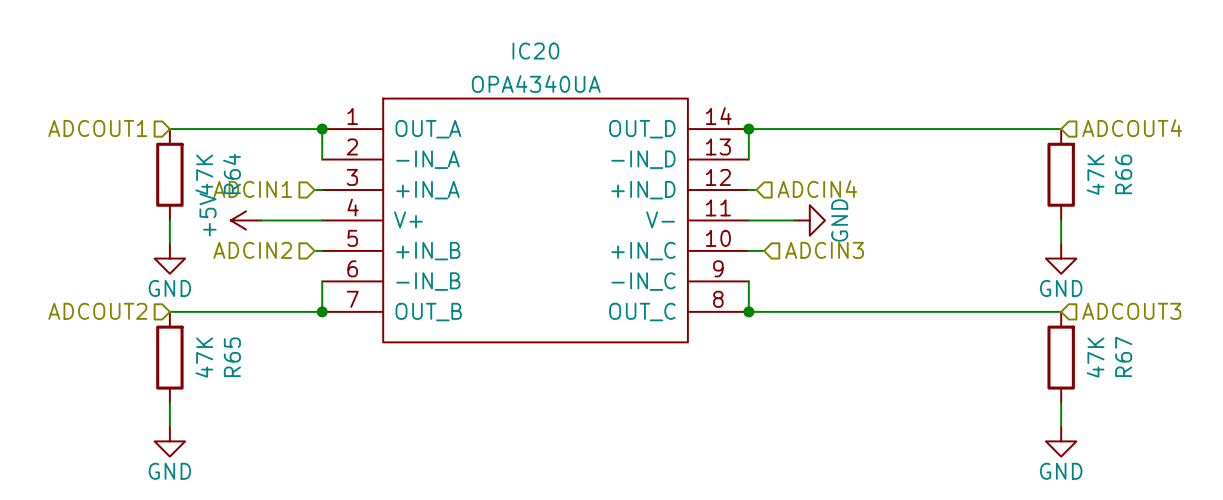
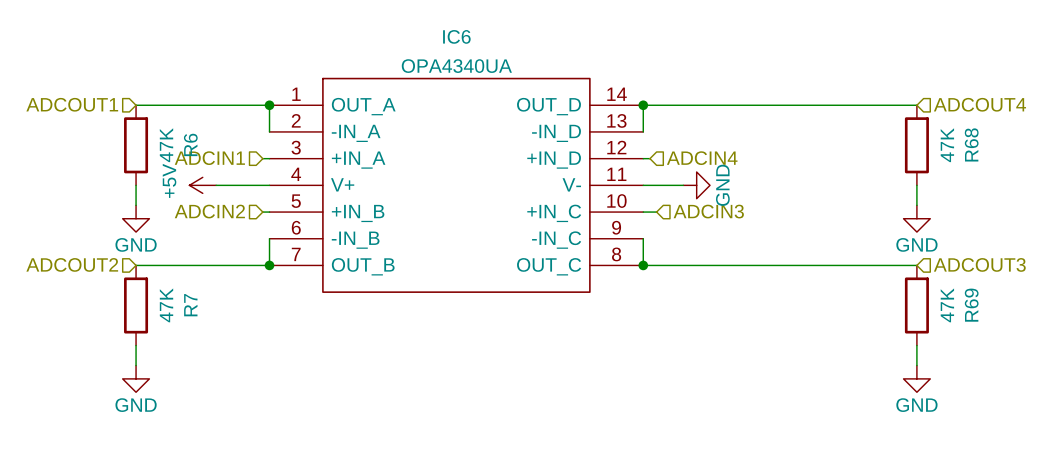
IC20 name: IC20 (535, 51) -> IC6 (456, 36)
R64 name: R64 (232, 174) -> R6 (190, 144)
R66 name: R66 (1123, 174) -> R68 (971, 144)
R67 name: R67 (1123, 356) -> R69 (971, 305)
R65 name: R65 (232, 357) -> R7 (190, 305)

